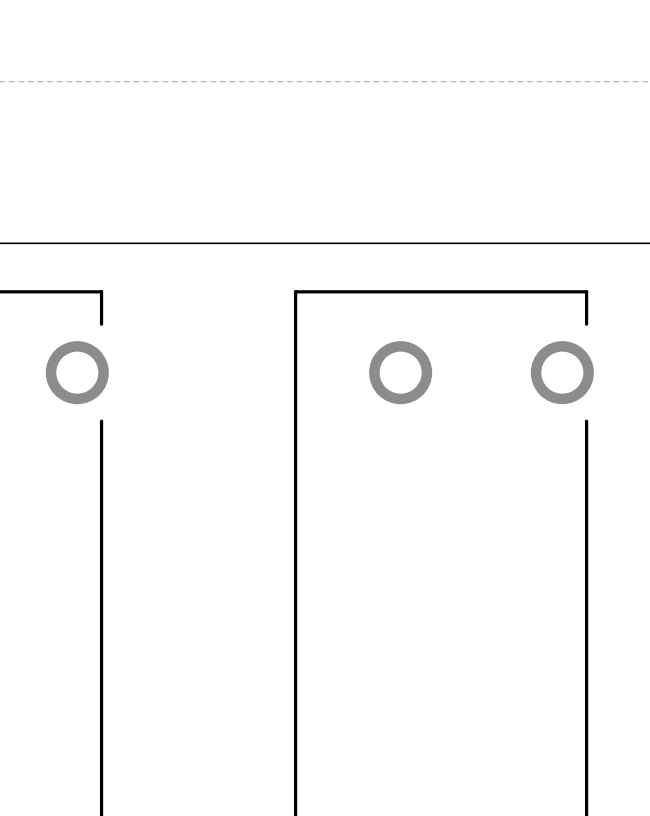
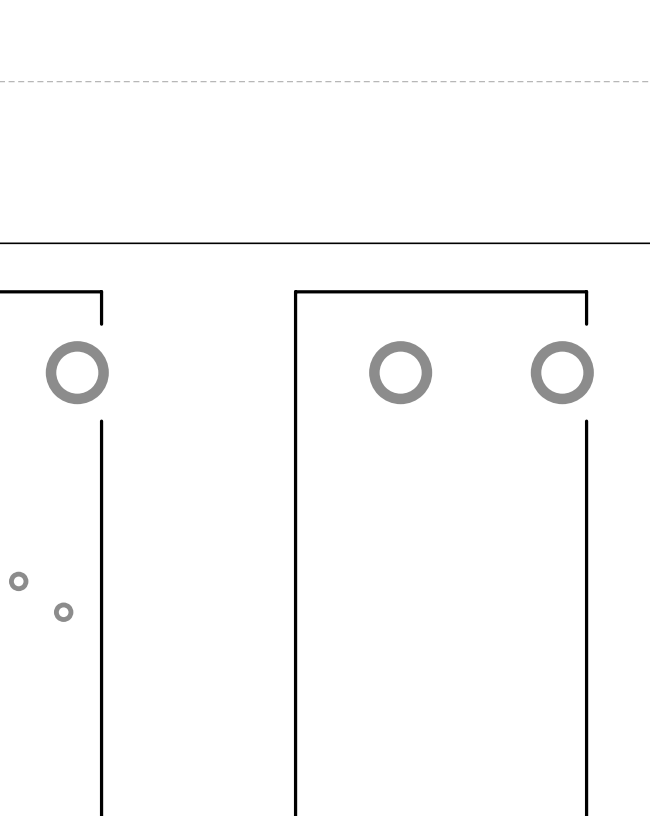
via: none -> (18, 581)
via: none -> (63, 612)

